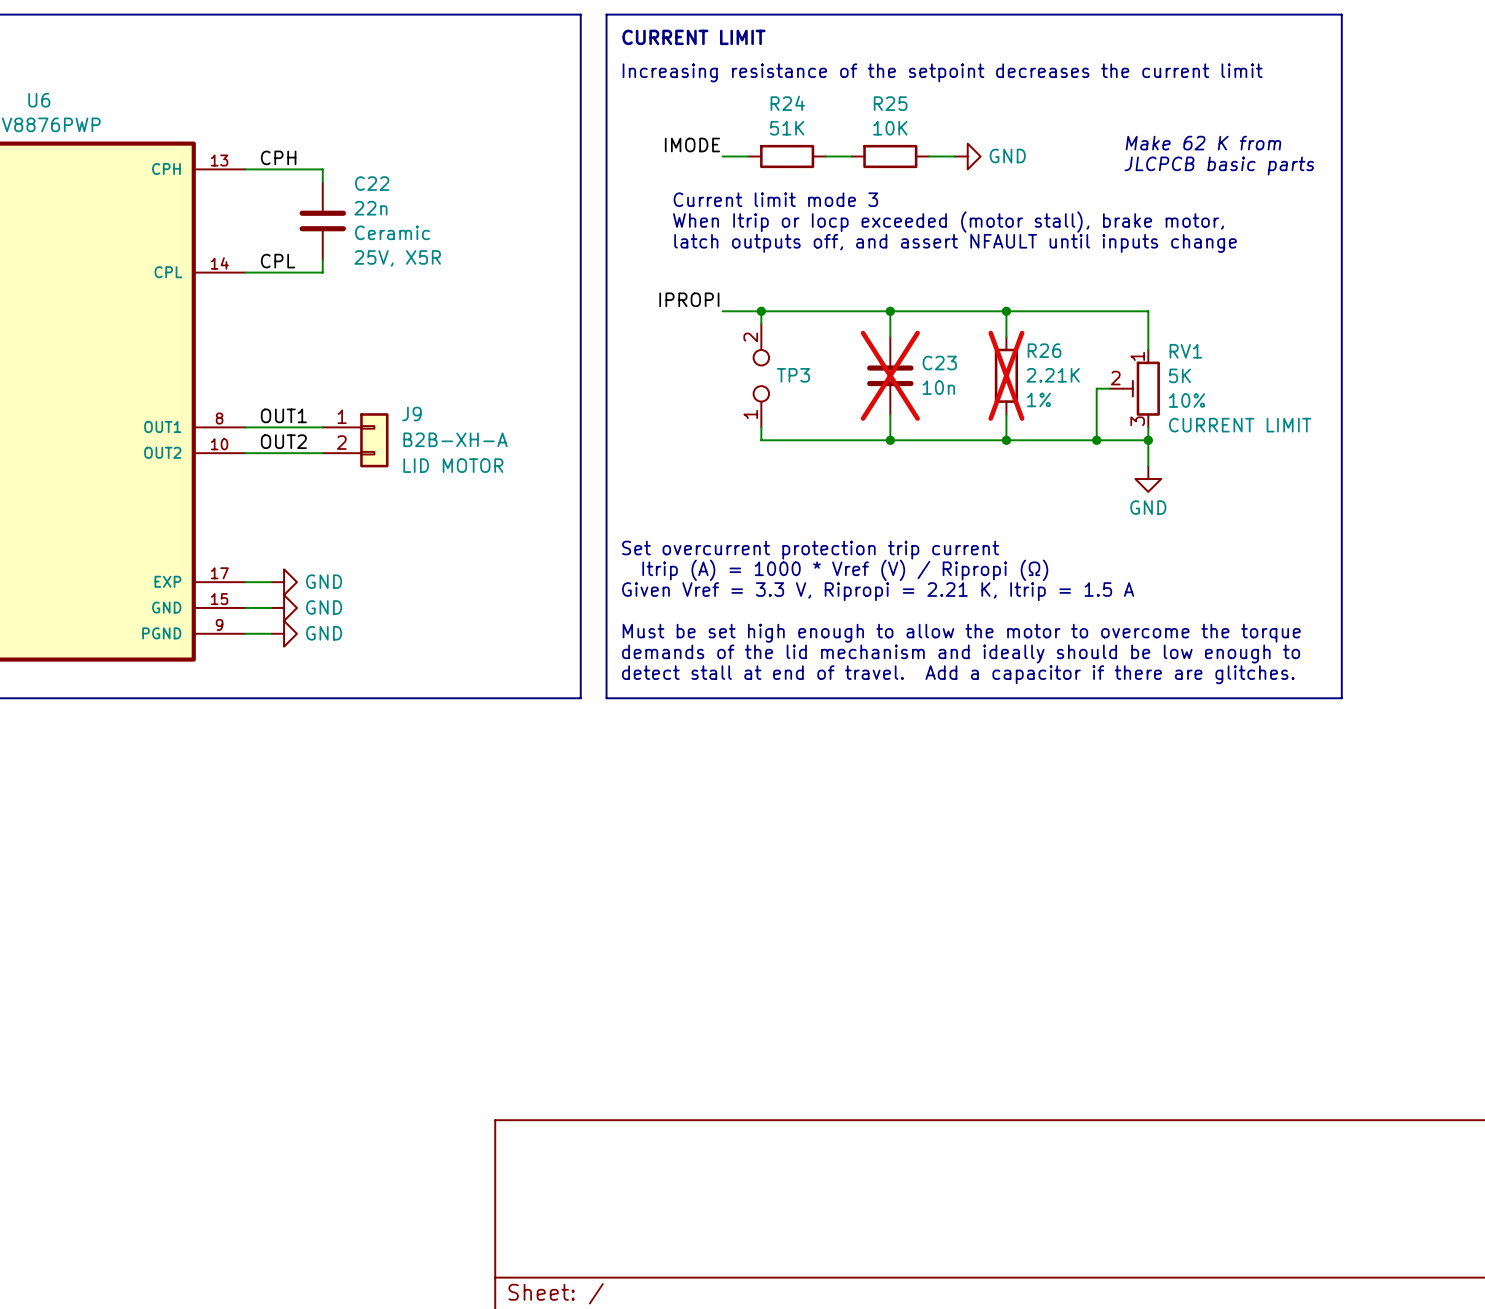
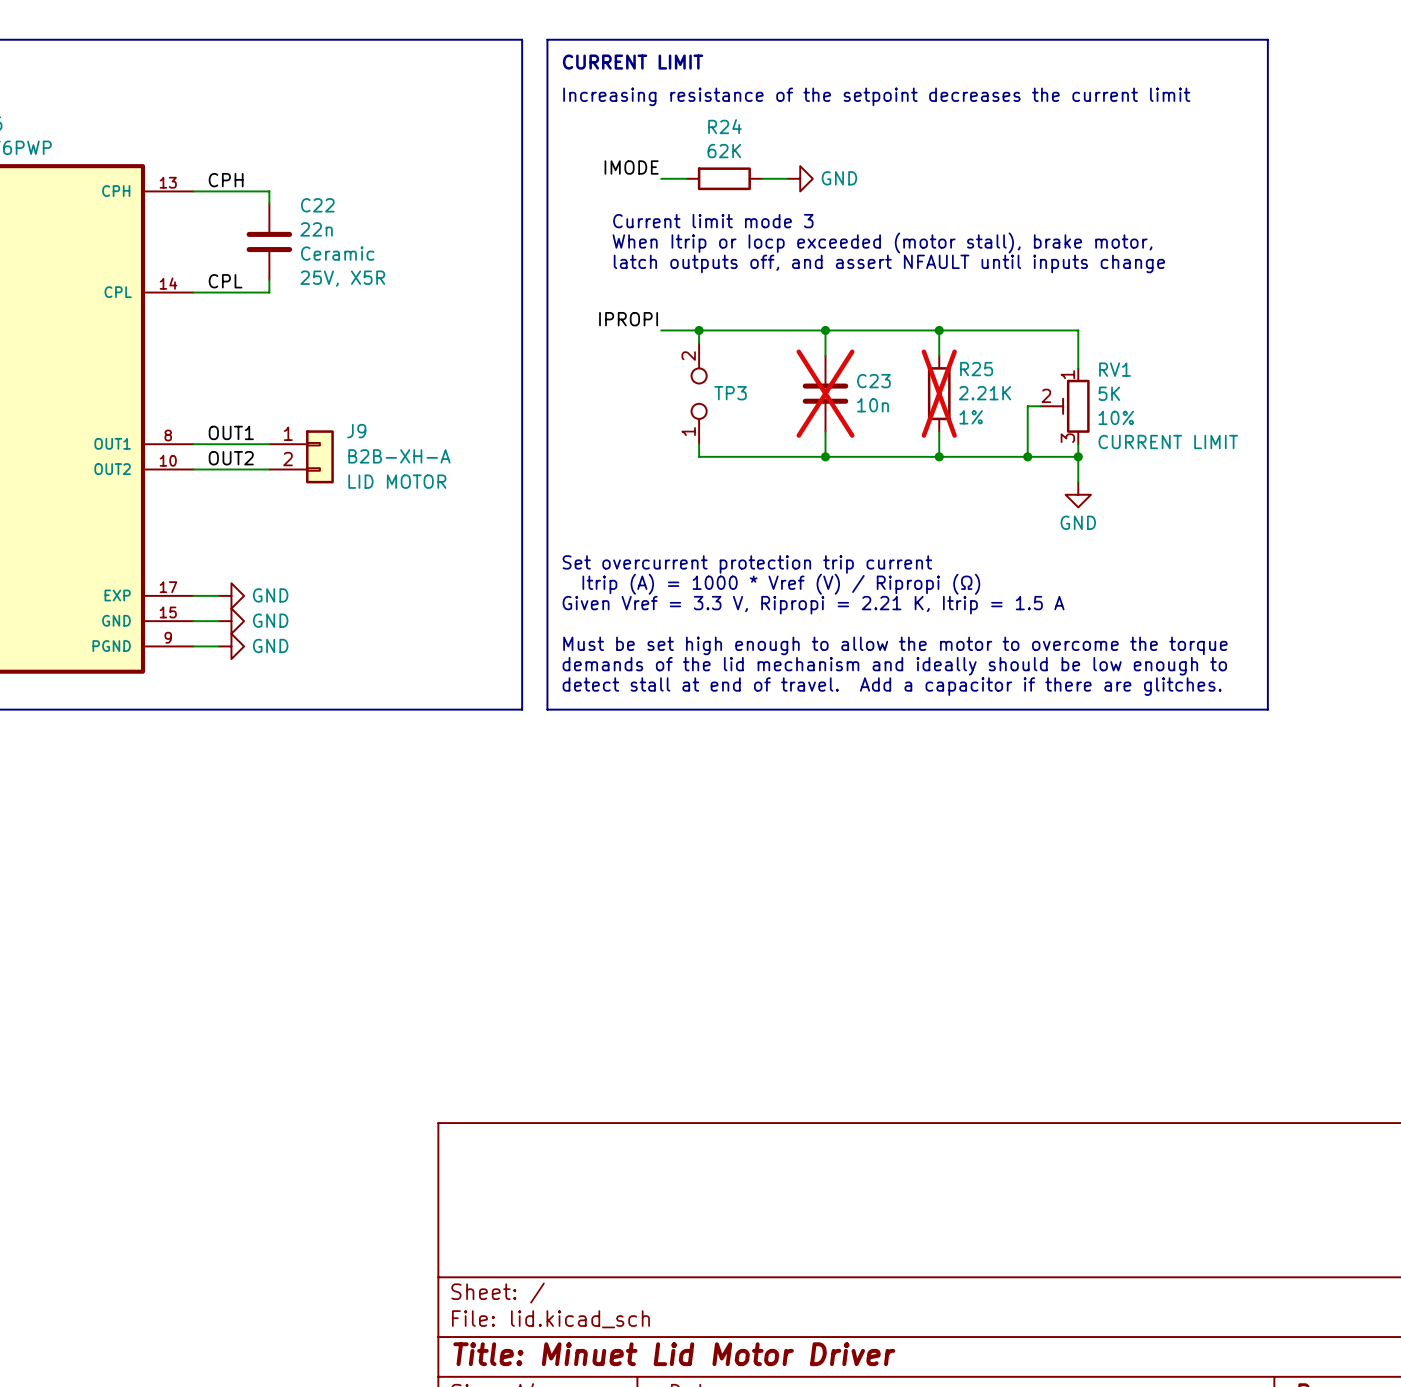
R24 value: 51K (787, 128) -> 62K (724, 151)
text: Make 62 K from (1203, 143) -> none
R25: 10K (890, 156) -> none
wire: (929, 156) (954, 156) -> none
power symbol position: GND (967, 156) -> GND (800, 178)
text: JLCPCB basic parts (1219, 166) -> none
R26 name: R26 (1044, 350) -> R25 (976, 369)

